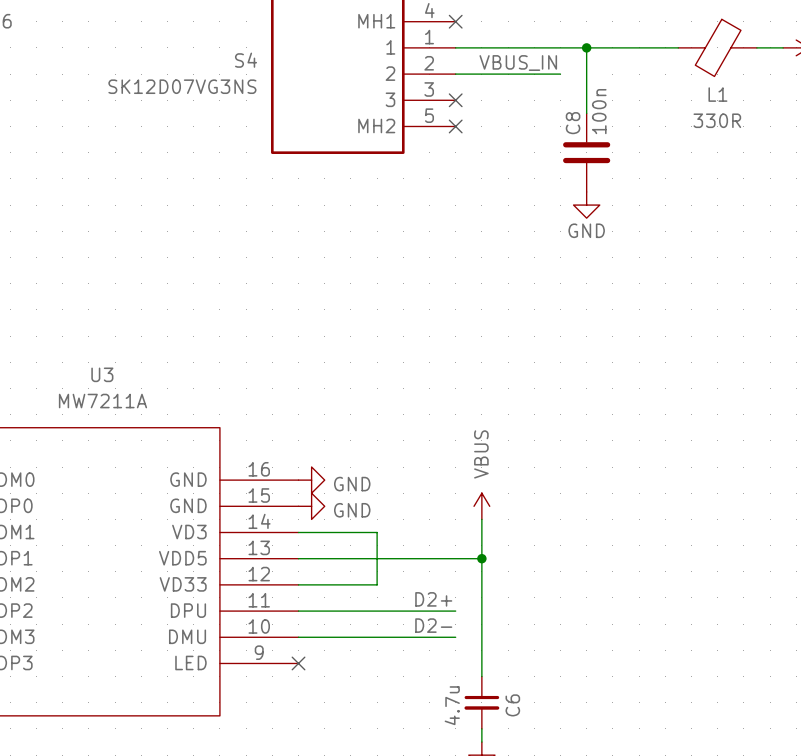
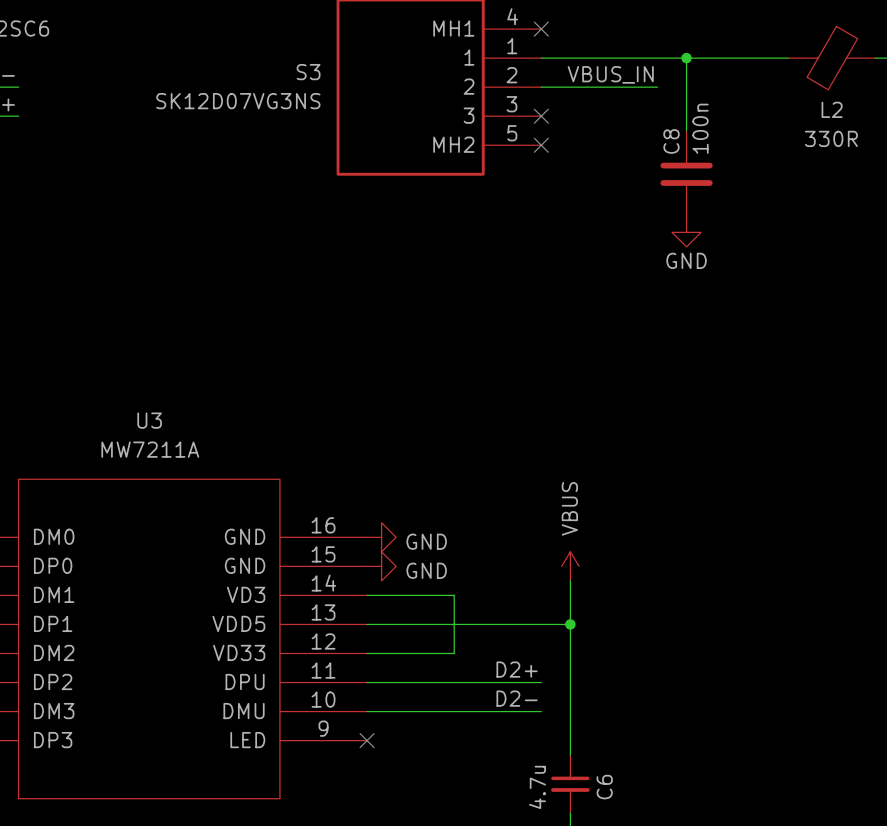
S4 name: S4 (246, 60) -> S3 (308, 72)
L1 name: L1 (717, 94) -> L2 (832, 109)

